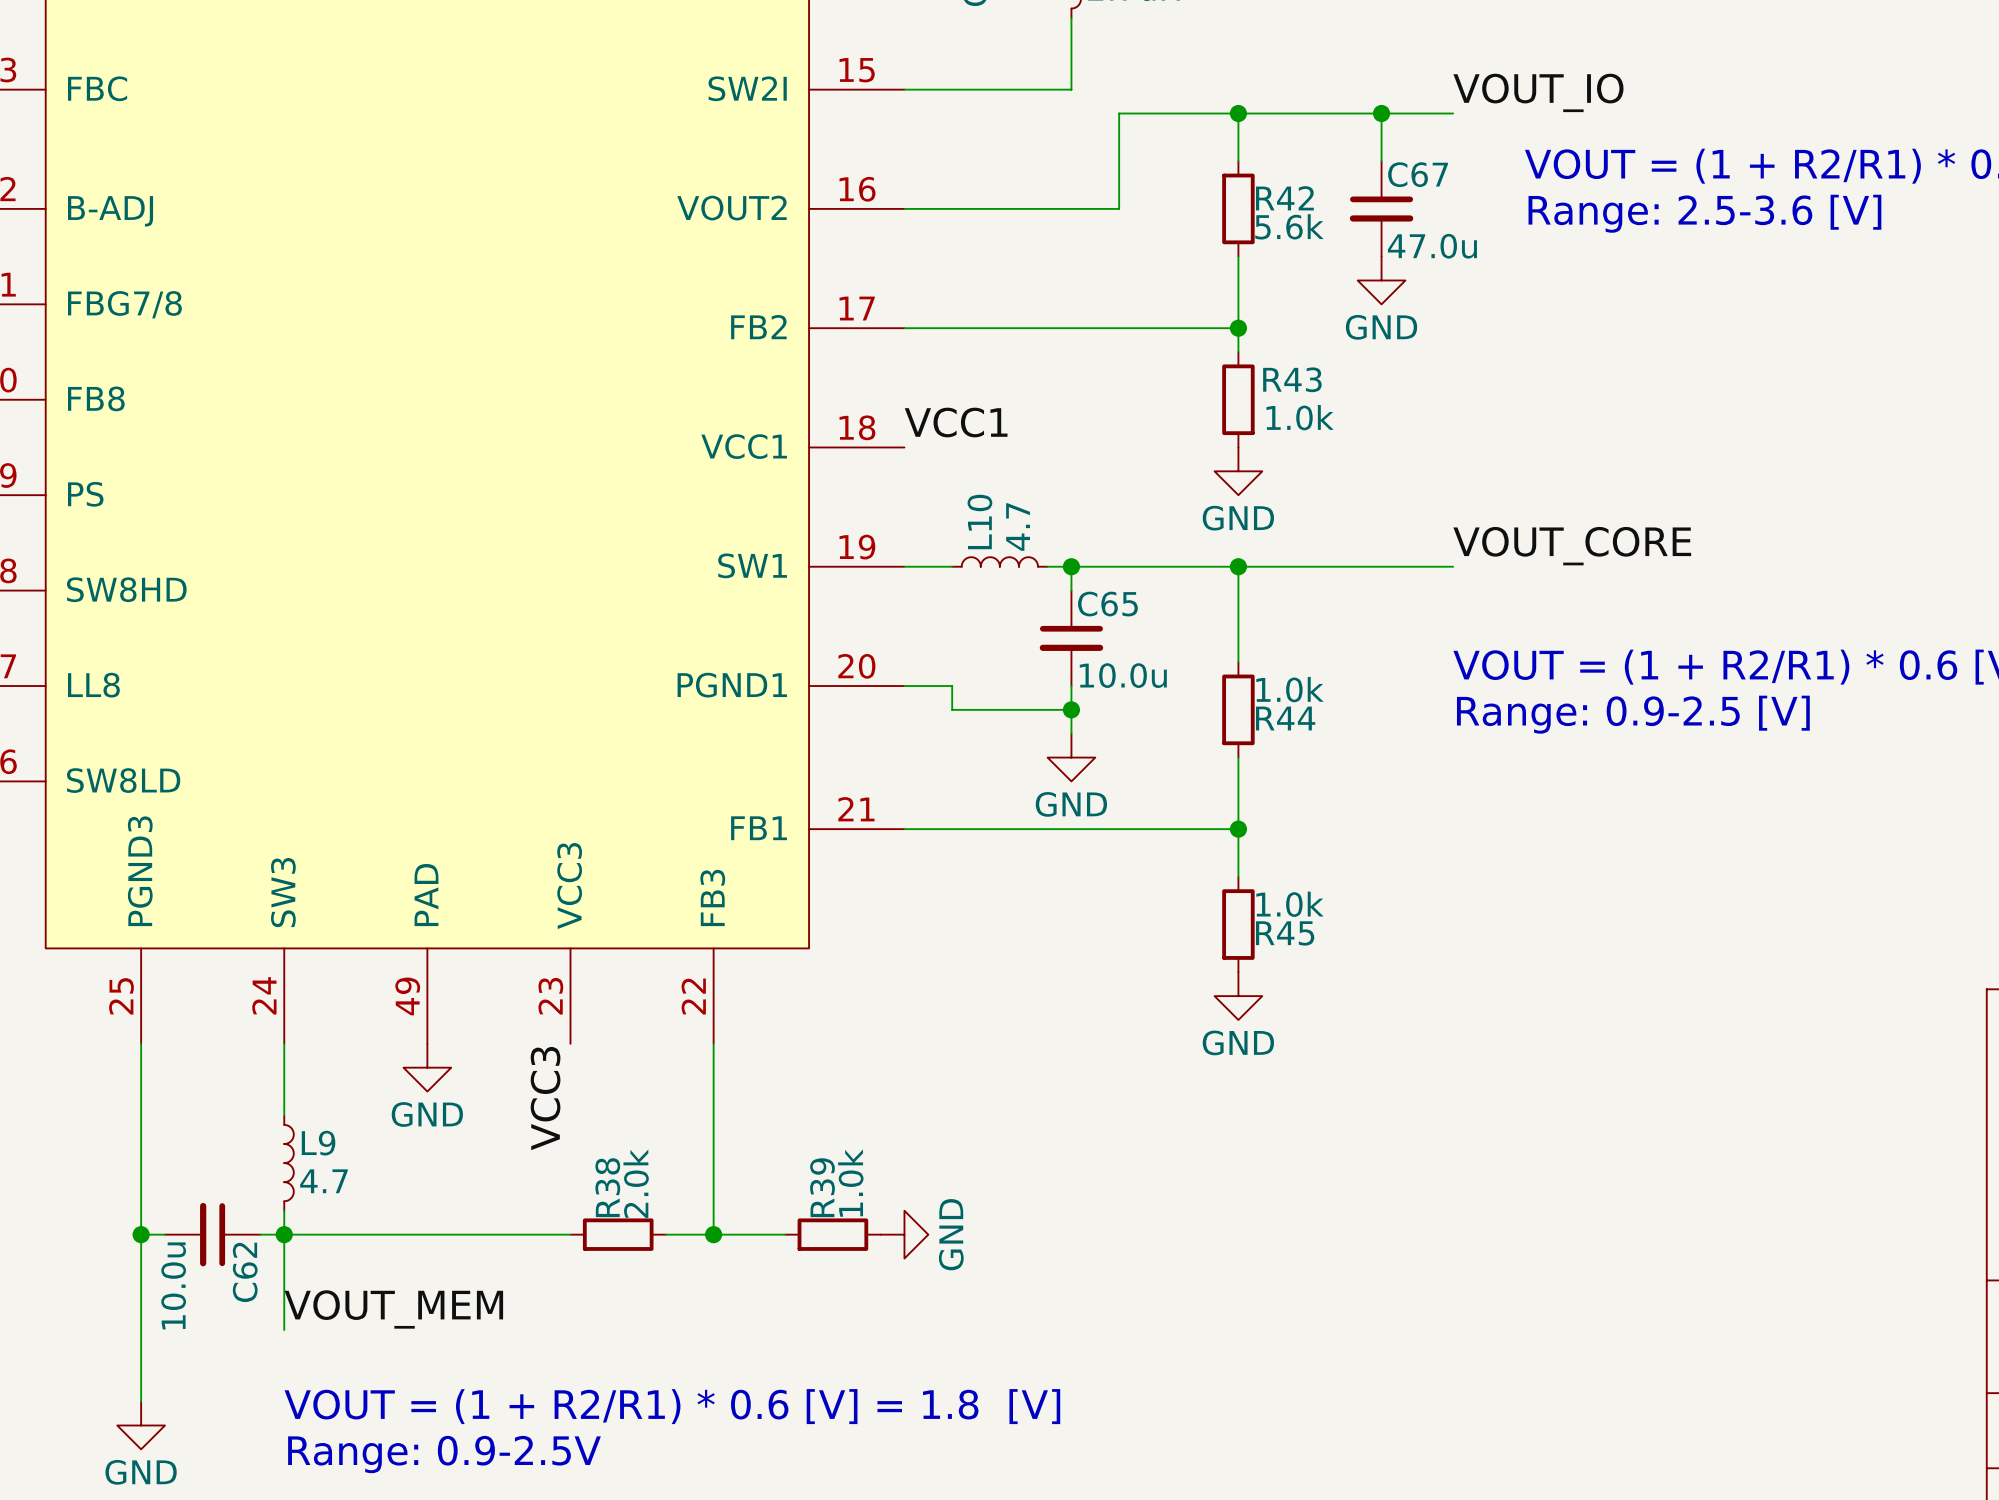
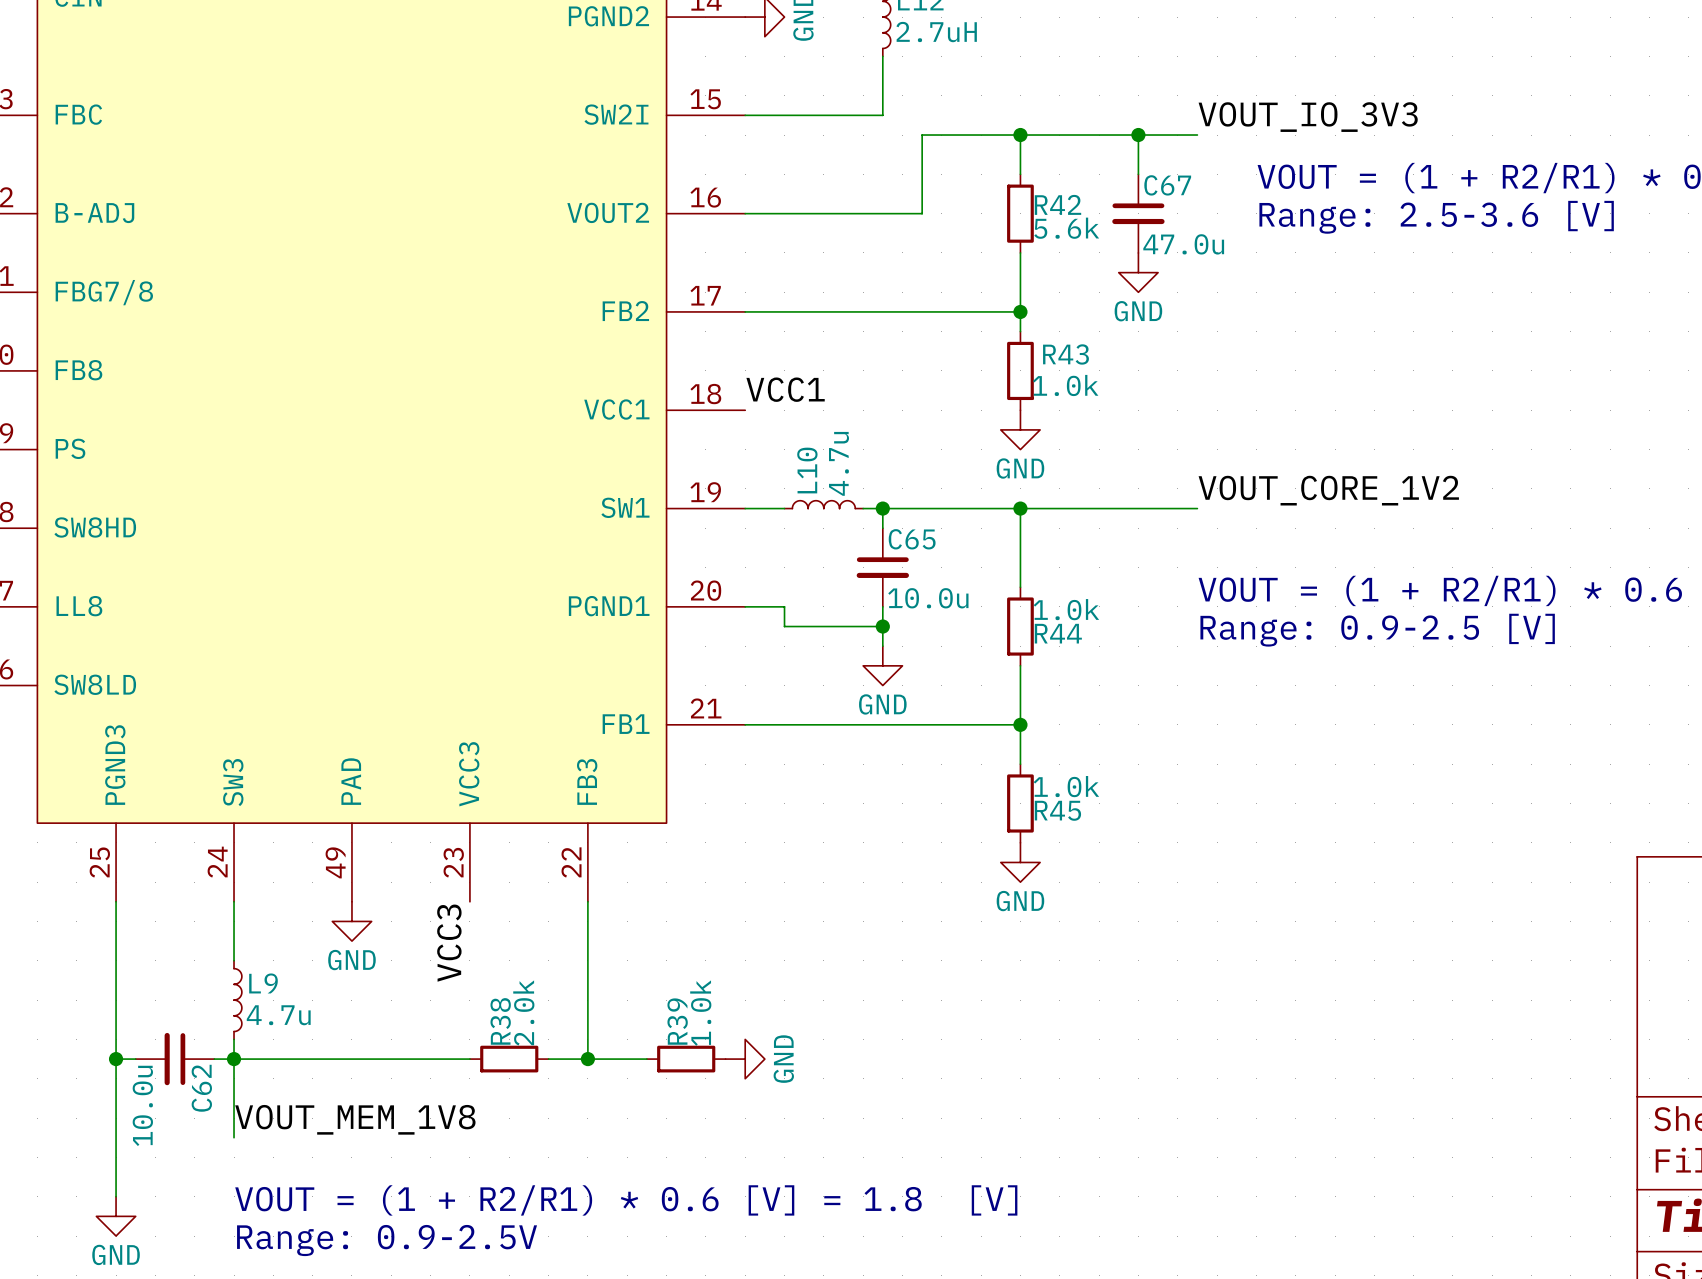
label: VOUT_IO (1538, 92) -> VOUT_IO_3V3 (1308, 117)
L10 value: 4.7 (1018, 527) -> 4.7u (839, 463)
label: VOUT_CORE (1572, 546) -> VOUT_CORE_1V2 (1328, 490)
L9 value: 4.7 (323, 1181) -> 4.7u (278, 1015)
label: VOUT_MEM (393, 1309) -> VOUT_MEM_1V8 (355, 1119)

